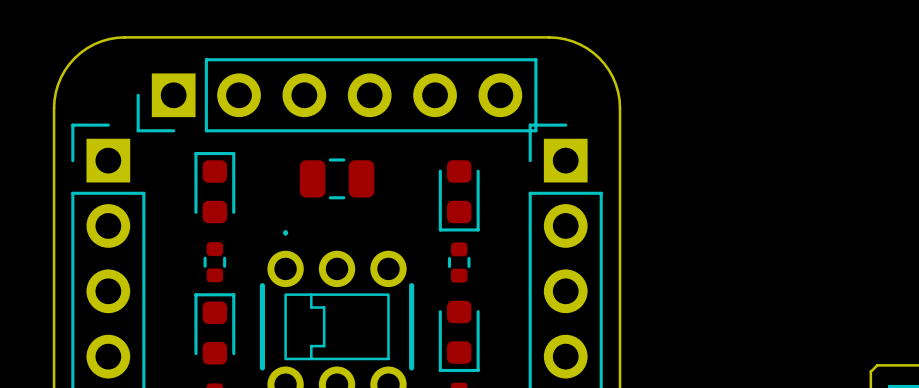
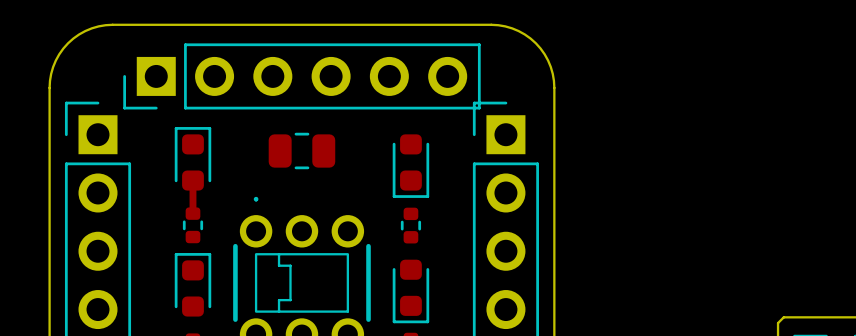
top track: none -> (192, 180) (192, 213)

